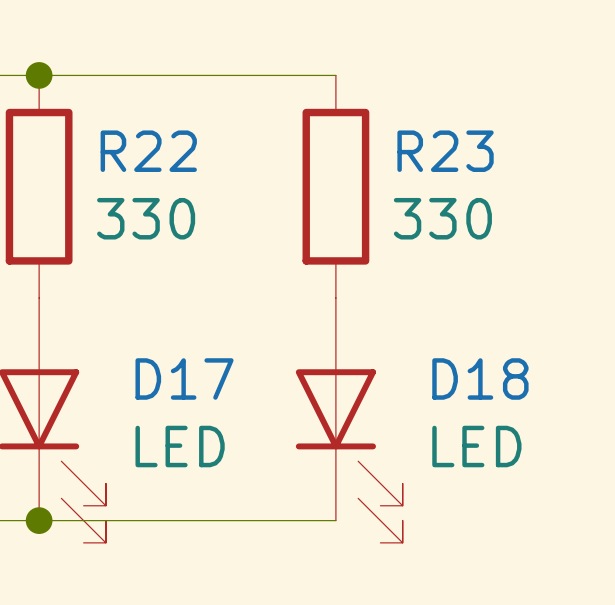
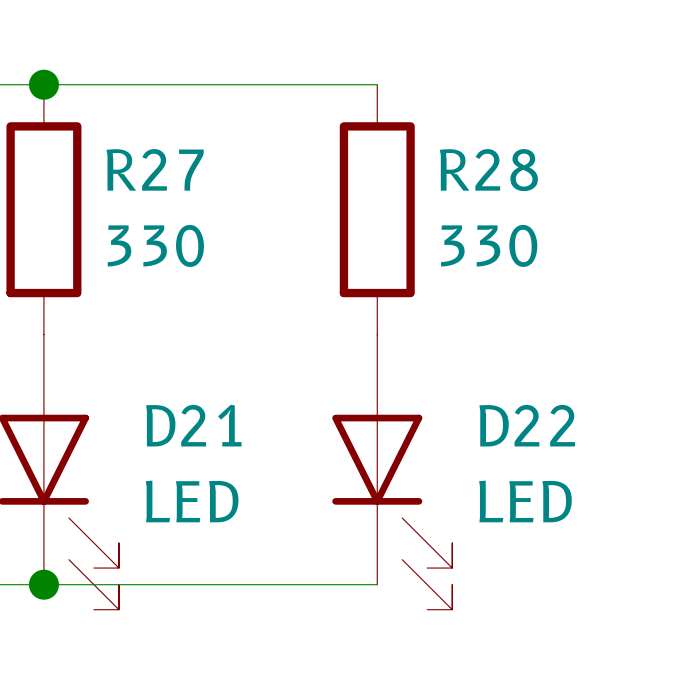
R22 name: R22 (148, 151) -> R27 (155, 169)
R23 name: R23 (445, 151) -> R28 (488, 170)
D17 name: D17 (184, 378) -> D21 (193, 425)
D18 name: D18 (480, 378) -> D22 (527, 425)

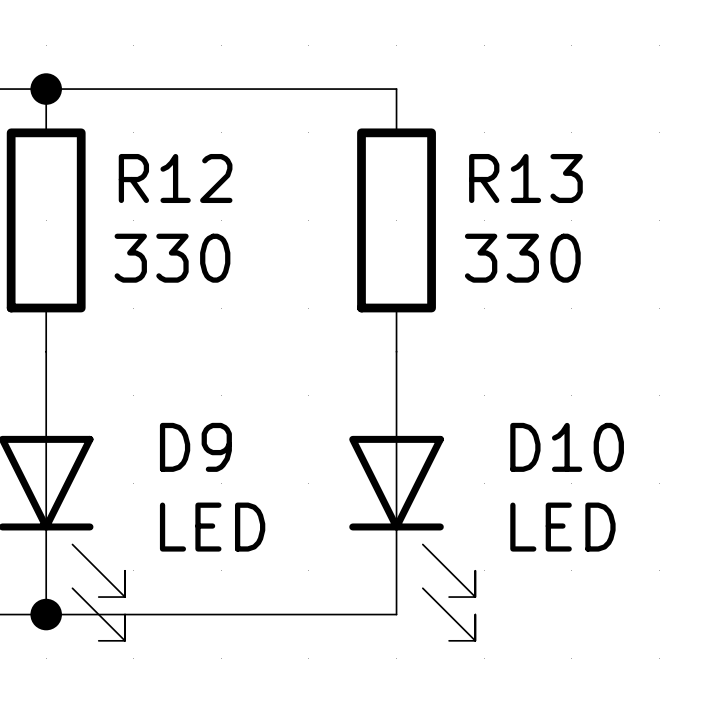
R27 name: R27 (155, 169) -> R12 (175, 178)
R28 name: R28 (488, 170) -> R13 (525, 178)
D21 name: D21 (193, 425) -> D9 (195, 447)
D22 name: D22 (527, 425) -> D10 (567, 447)

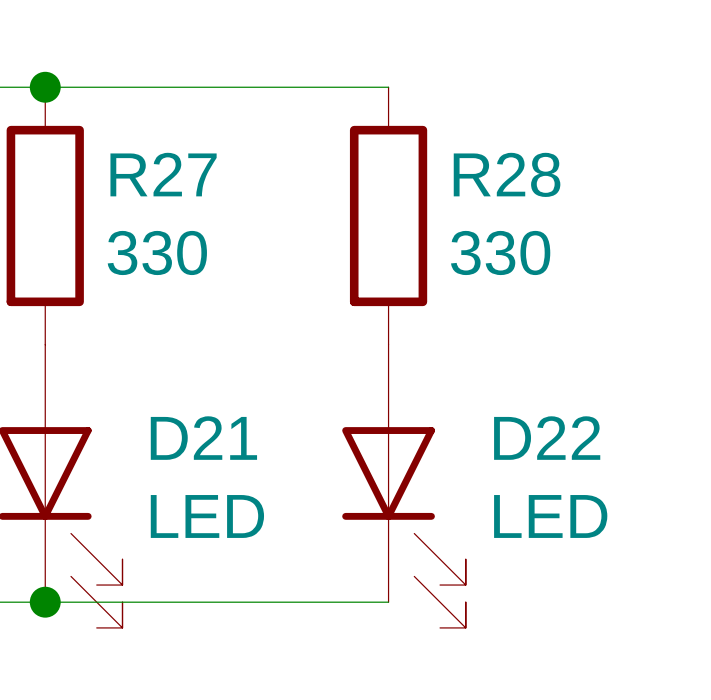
R12 name: R12 (175, 178) -> R27 (163, 174)
R13 name: R13 (525, 178) -> R28 (507, 174)
D9 name: D9 (195, 447) -> D21 (203, 438)
D10 name: D10 (567, 447) -> D22 (547, 438)

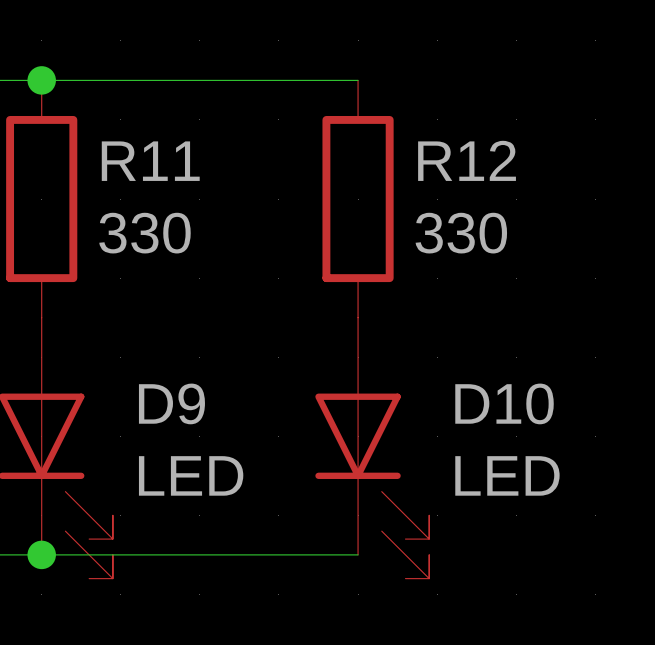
R27 name: R27 (163, 174) -> R11 (150, 161)
R28 name: R28 (507, 174) -> R12 (467, 160)
D21 name: D21 (203, 438) -> D9 (171, 403)
D22 name: D22 (547, 438) -> D10 (504, 403)

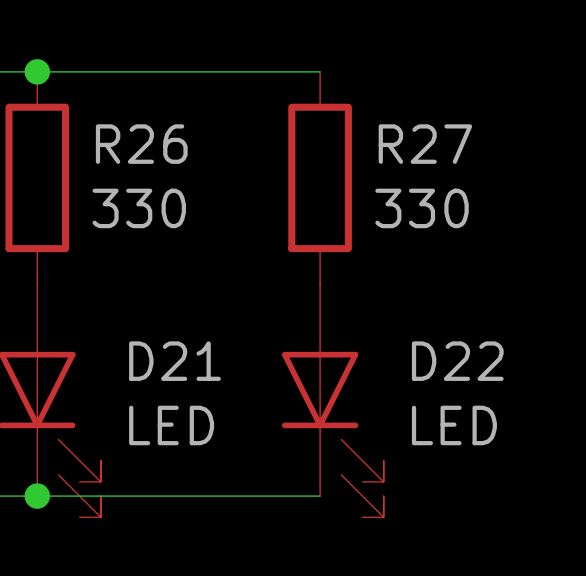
R12 name: R12 (467, 160) -> R27 (425, 144)
R11 name: R11 (150, 161) -> R26 (141, 144)
D9 name: D9 (171, 403) -> D21 (174, 361)
D10 name: D10 (504, 403) -> D22 (457, 361)

